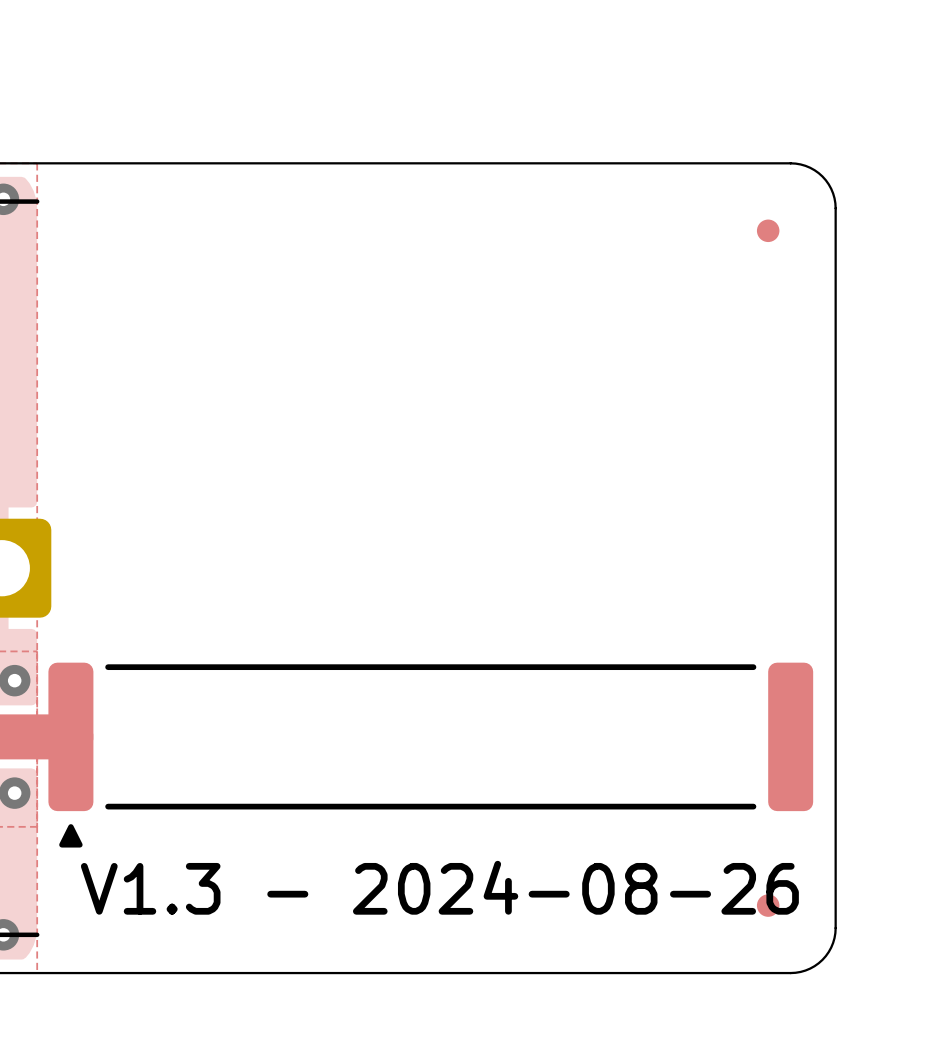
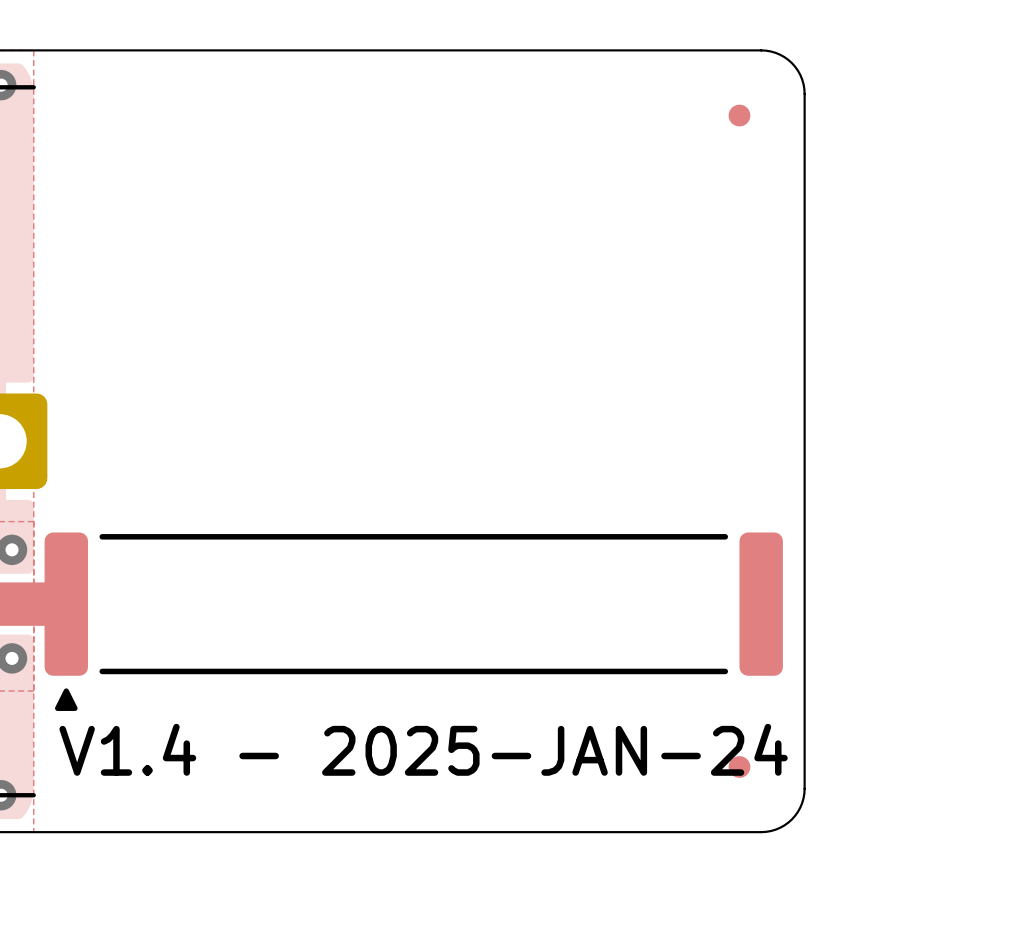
text: V1.3 - 2024-08-26 (439, 887) -> V1.4 - 2025-JAN-24 (423, 749)

